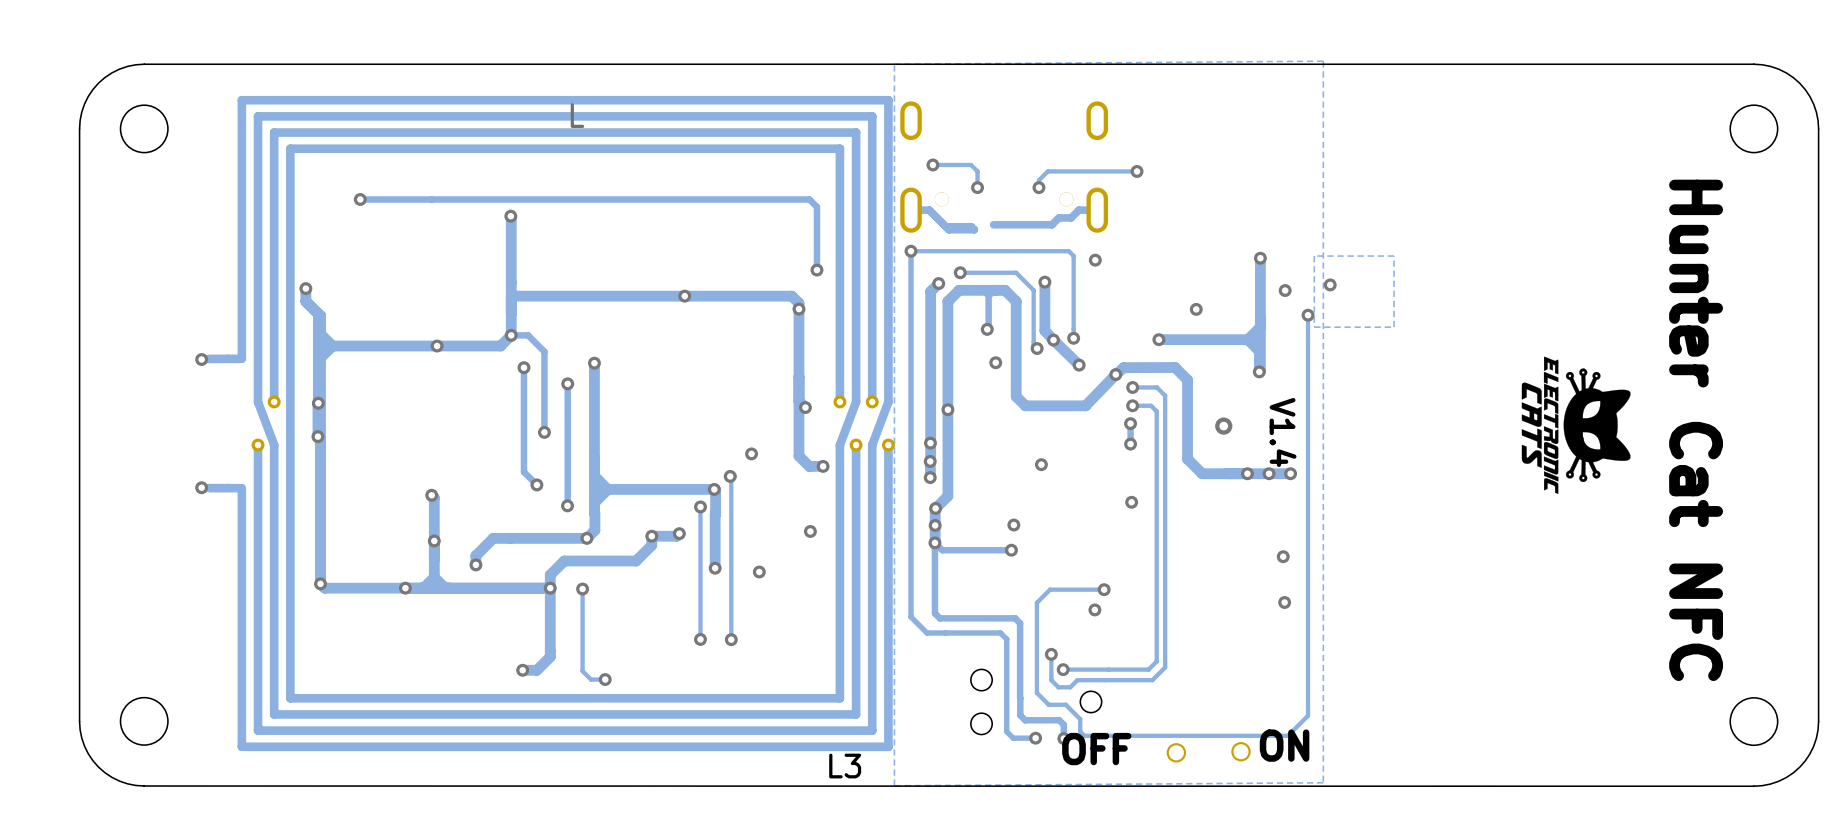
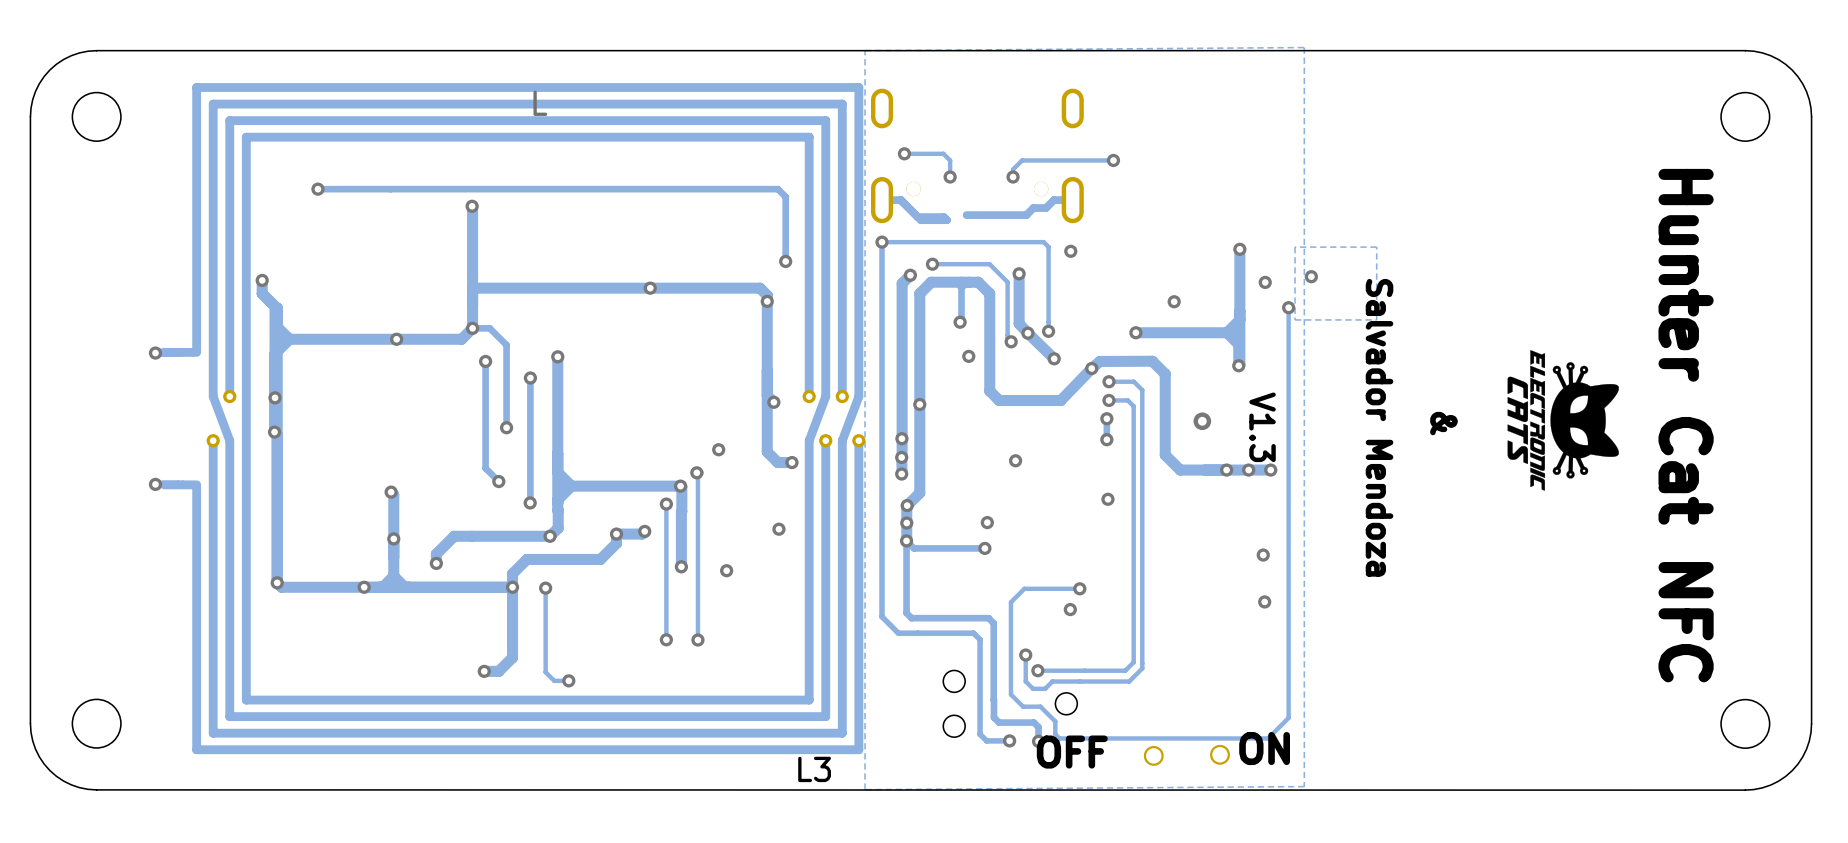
text: none -> & (1443, 423)
text: V1.4 (1283, 432) -> V1.3 (1262, 427)
text: none -> Salvador Mendoza (1379, 427)

